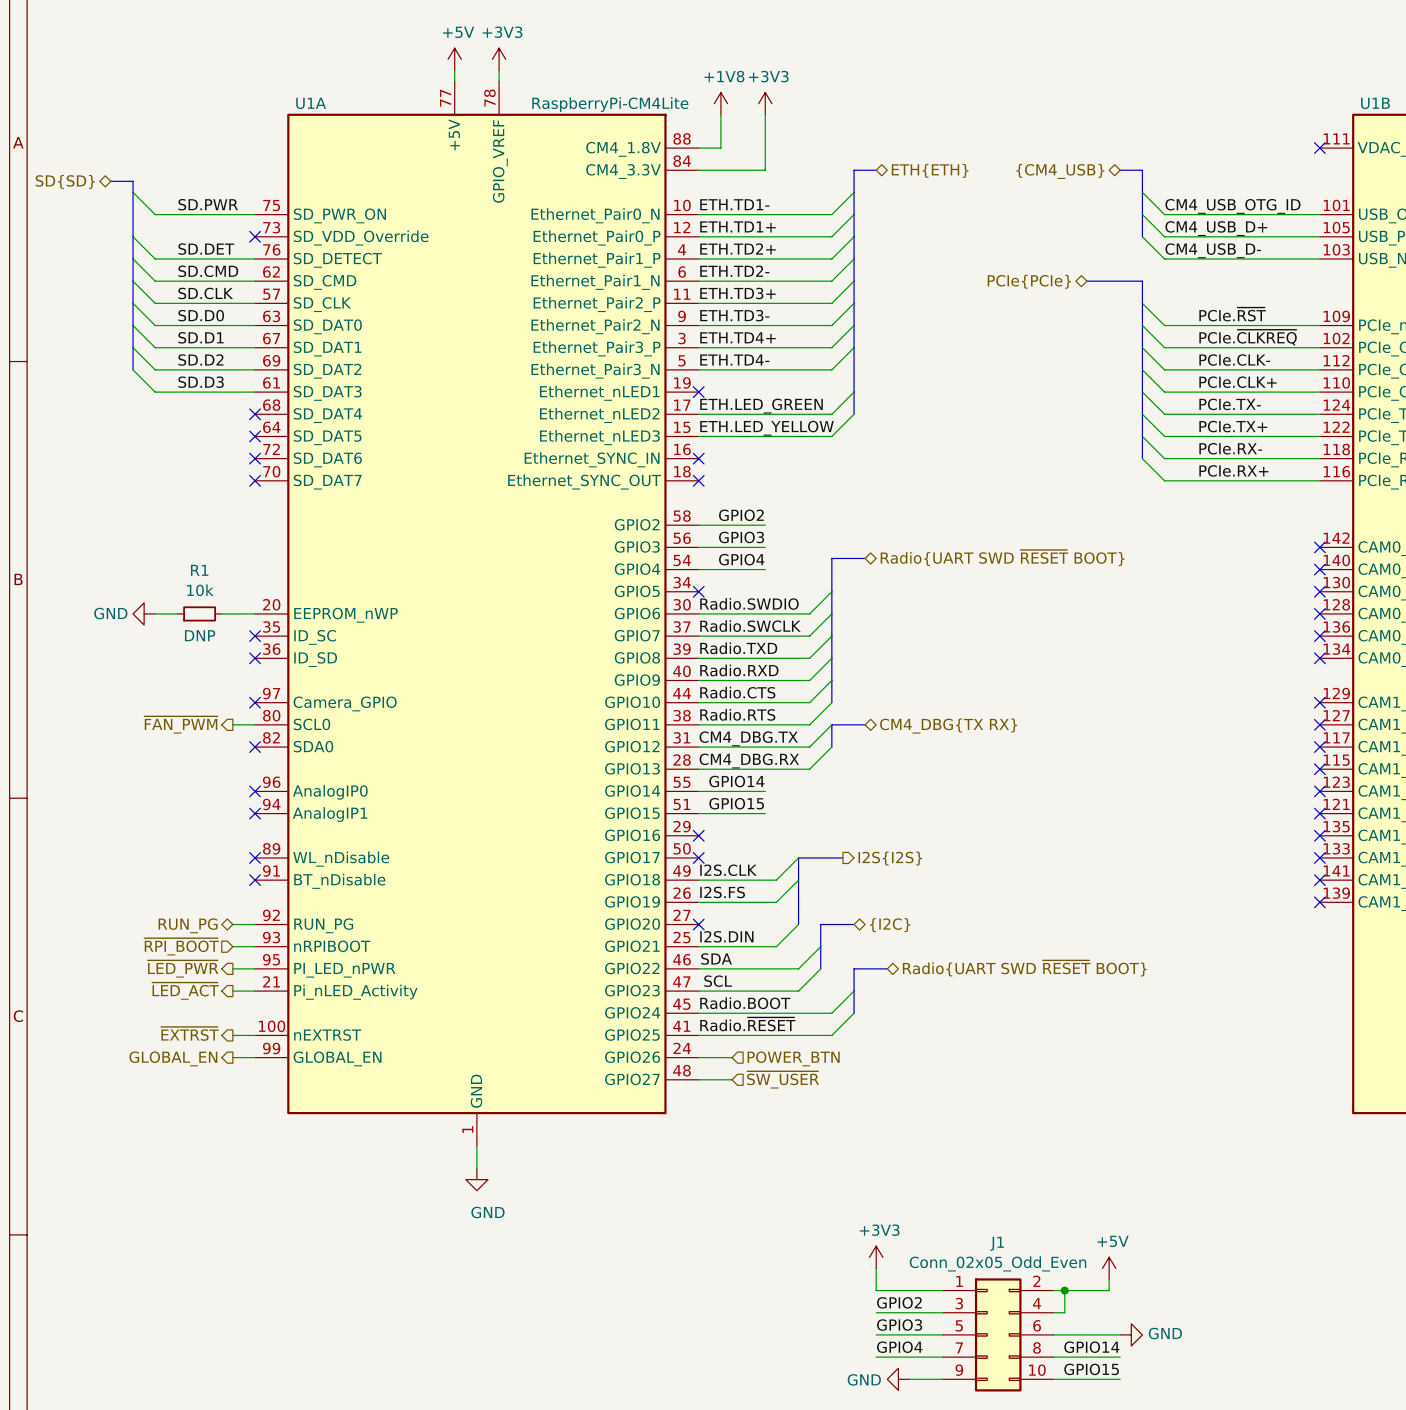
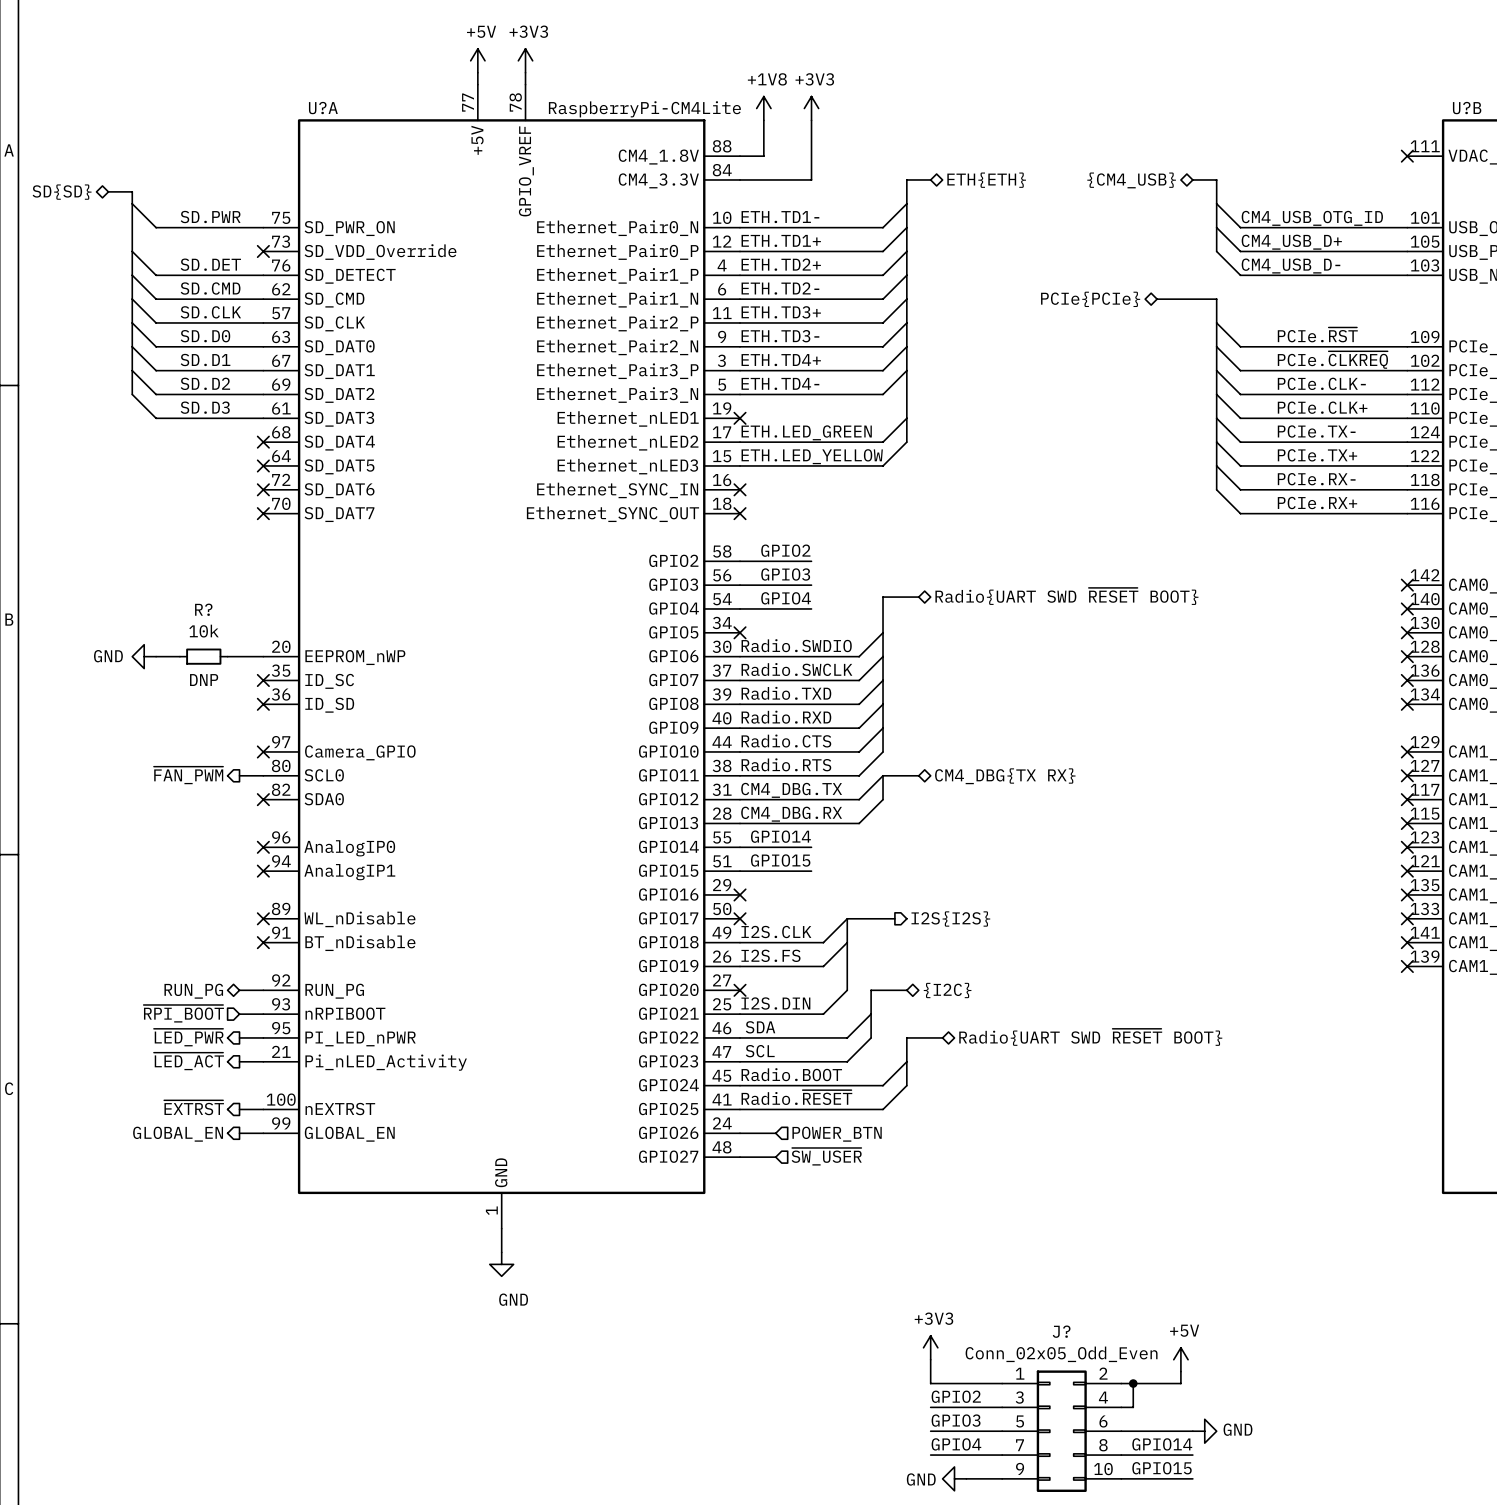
U1A name: U1A (311, 103) -> U?A (323, 108)
U1B name: U1B (1375, 103) -> U?B (1467, 108)
R1 name: R1 (199, 570) -> R? (203, 609)
J1 name: J1 (997, 1243) -> J? (1061, 1331)

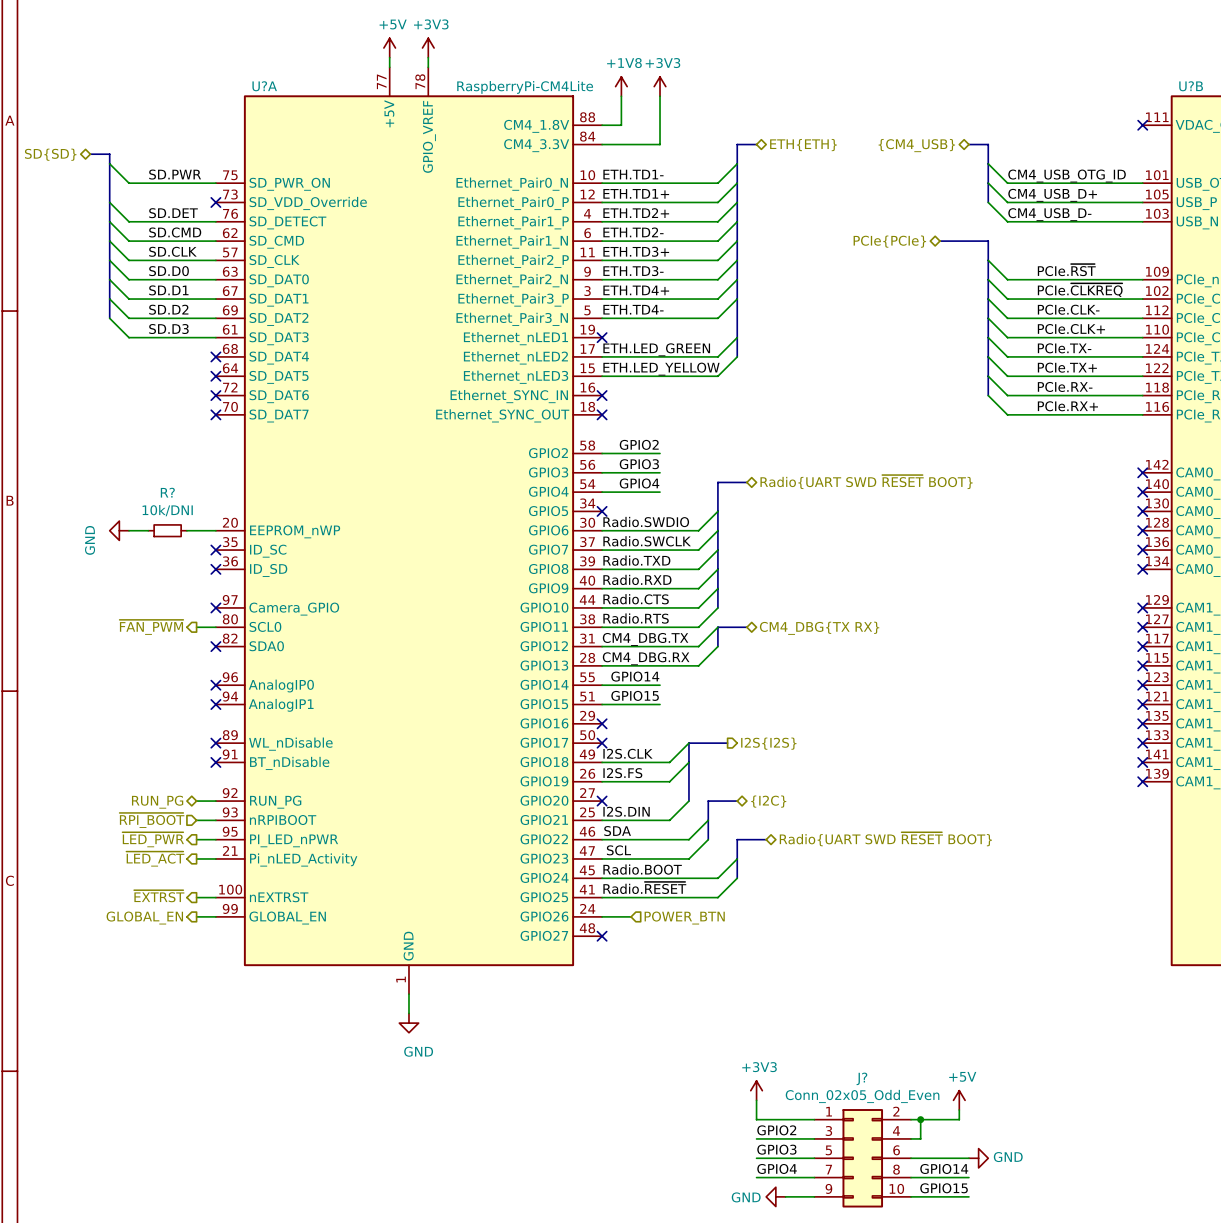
R? value: 10k (204, 631) -> 10k/DNI (167, 510)
power symbol text rotation: 0° (108, 656) -> 90° counterclockwise (90, 540)
R? text: DNP (204, 680) -> none
hierarchical label: ~{SW_USER} (826, 1156) -> none
wire: (740, 1157) (775, 1157) -> none
no-connect mark: none -> (602, 936)

